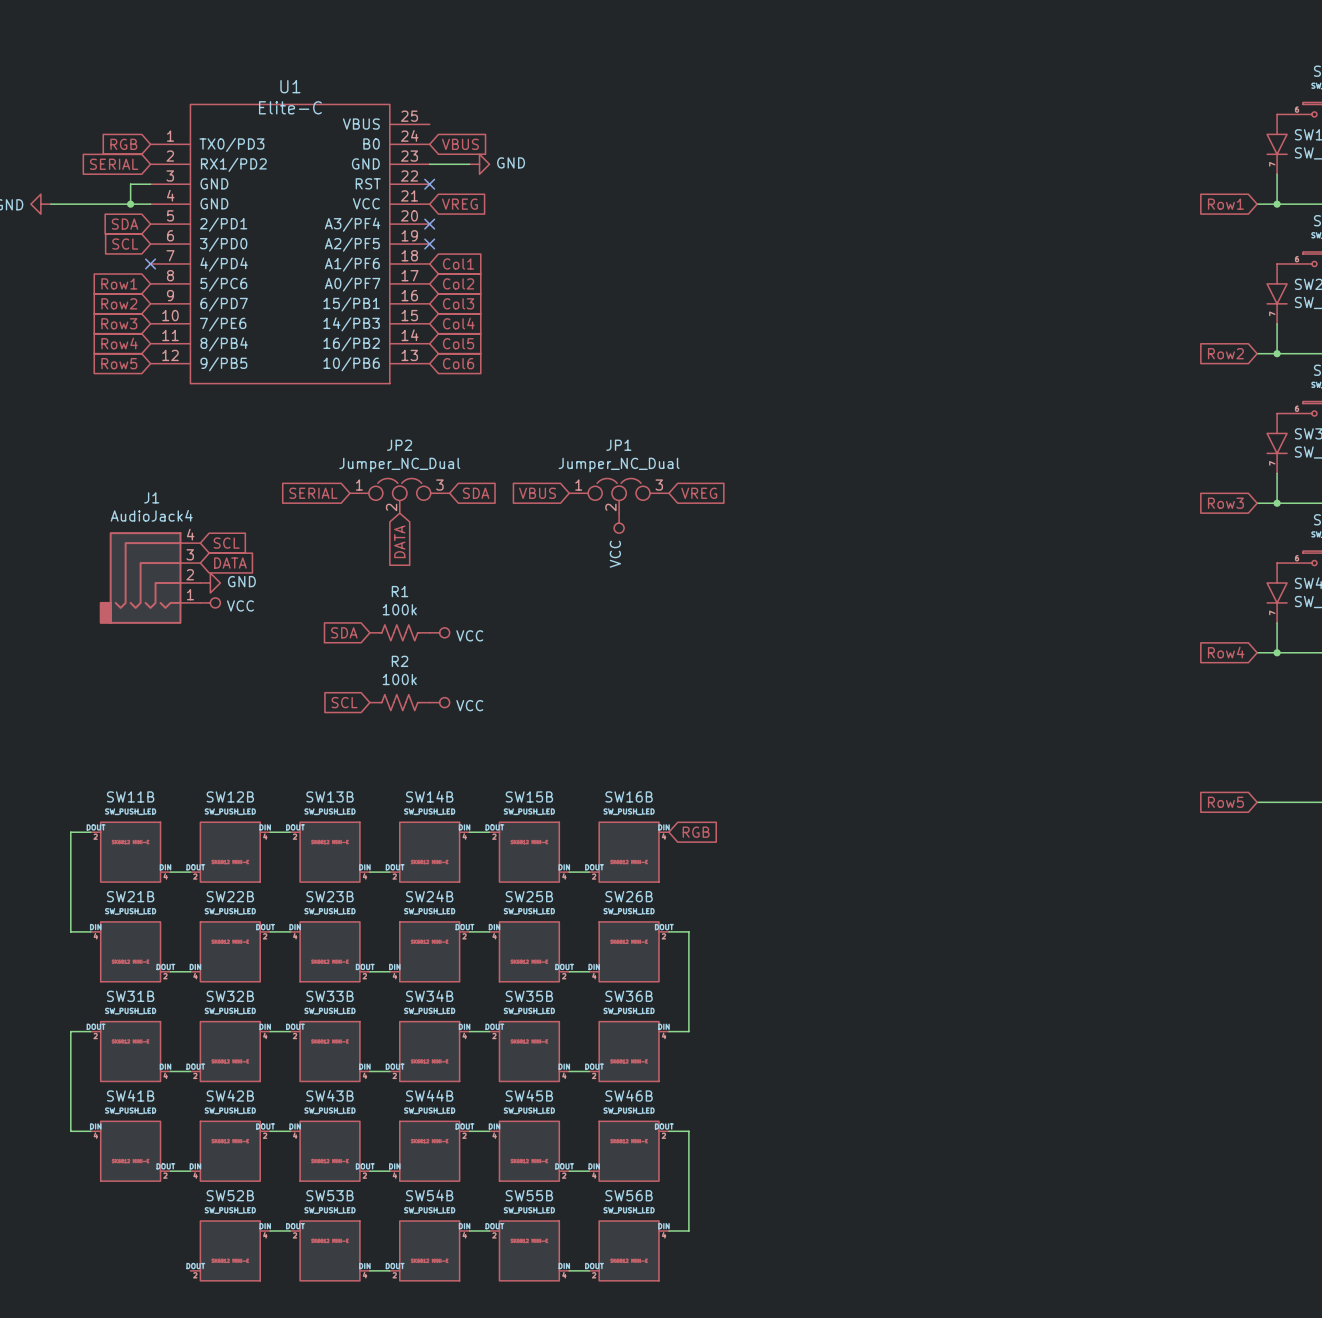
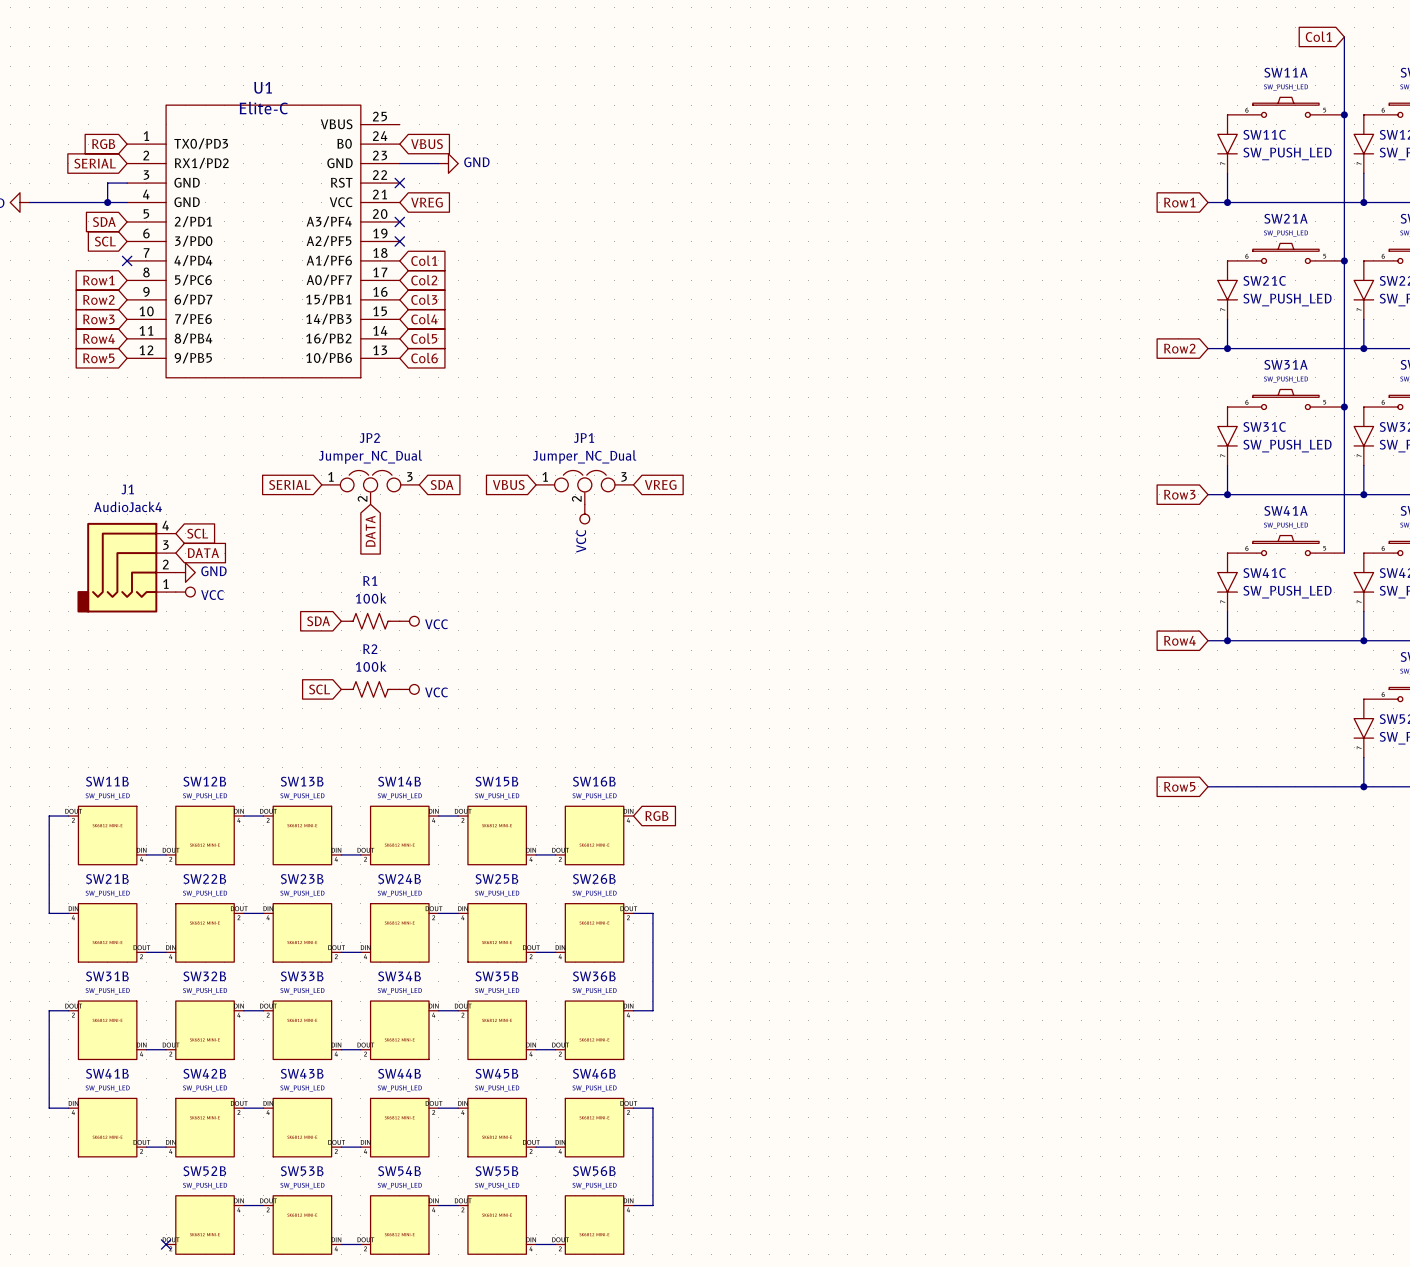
no-connect mark: none -> (166, 1244)

